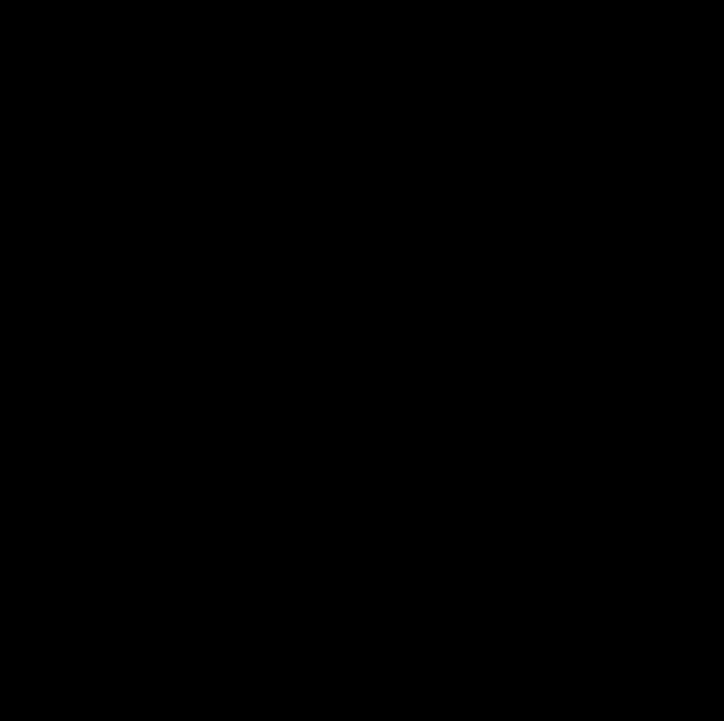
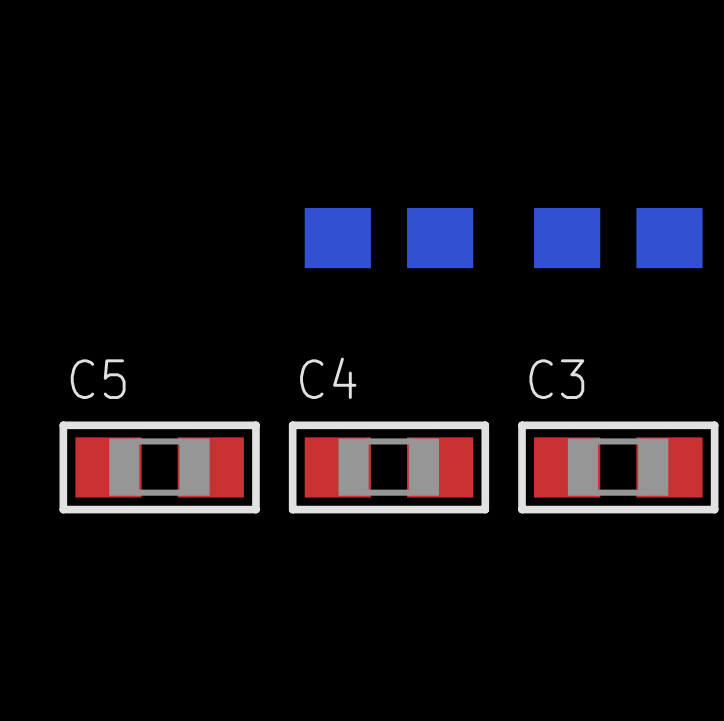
part: none -> (388, 238)
part: none -> (618, 238)
C5: none -> (159, 467)
C4: none -> (388, 467)
C3: none -> (618, 467)

